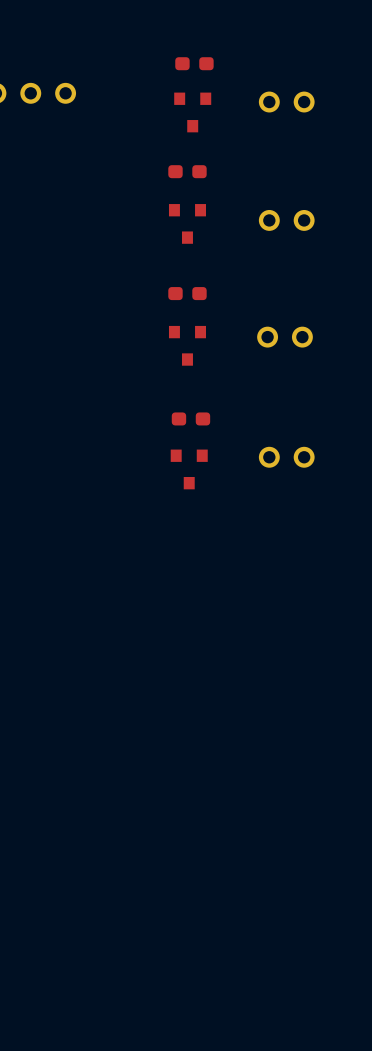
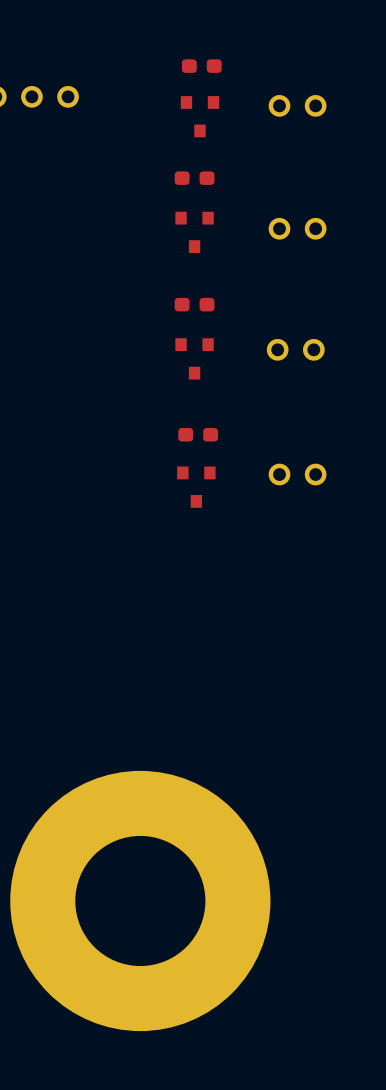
part: none -> (140, 900)

